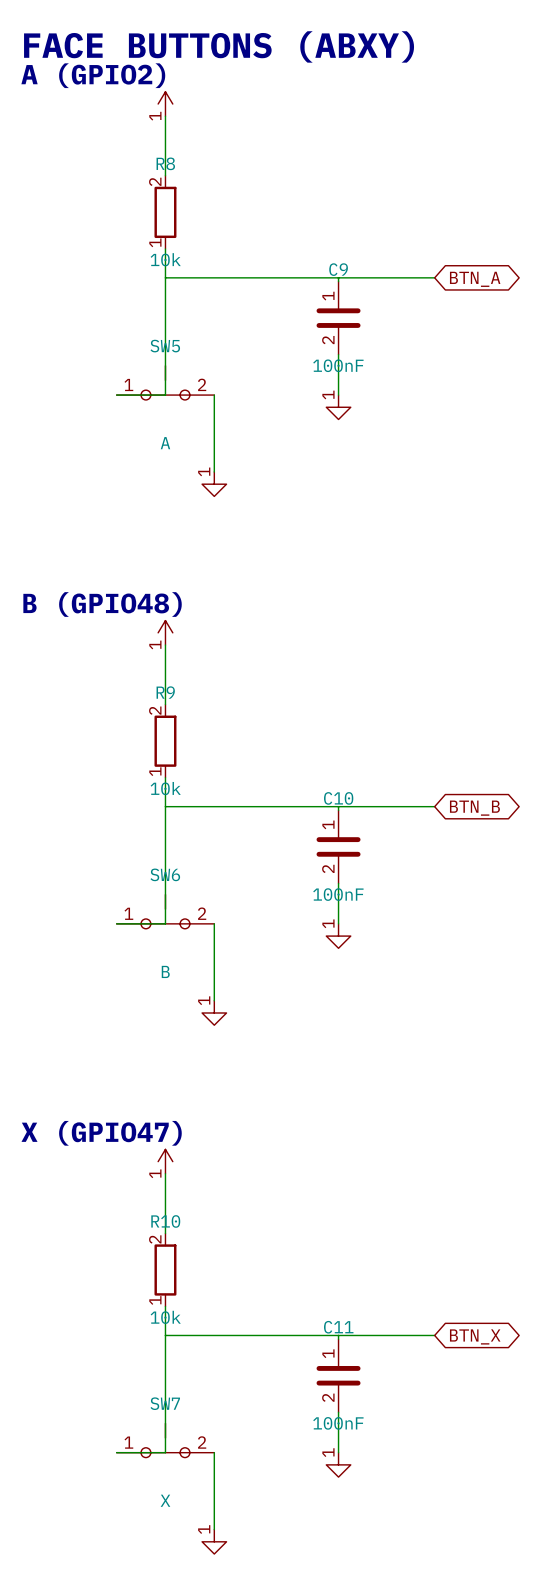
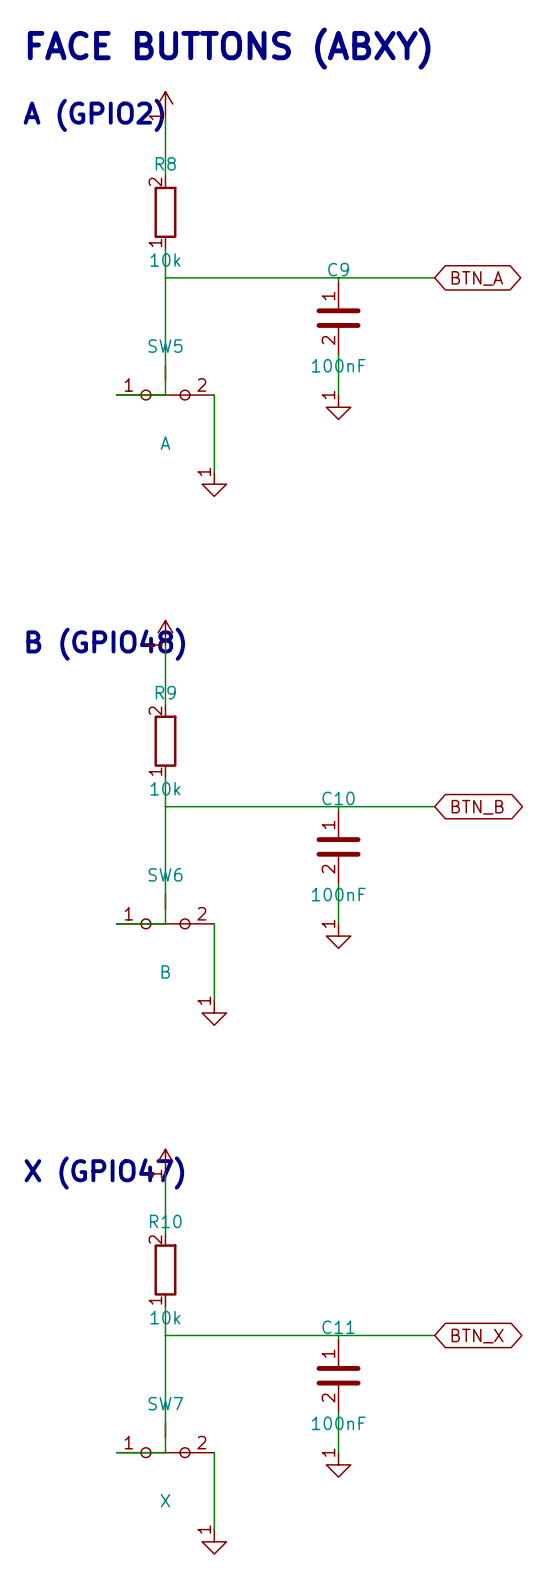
text position: A (GPIO2) (93, 75) -> A (GPIO2) (93, 115)
text position: B (GPIO48) (102, 604) -> B (GPIO48) (105, 644)
text position: X (GPIO47) (101, 1133) -> X (GPIO47) (104, 1173)

